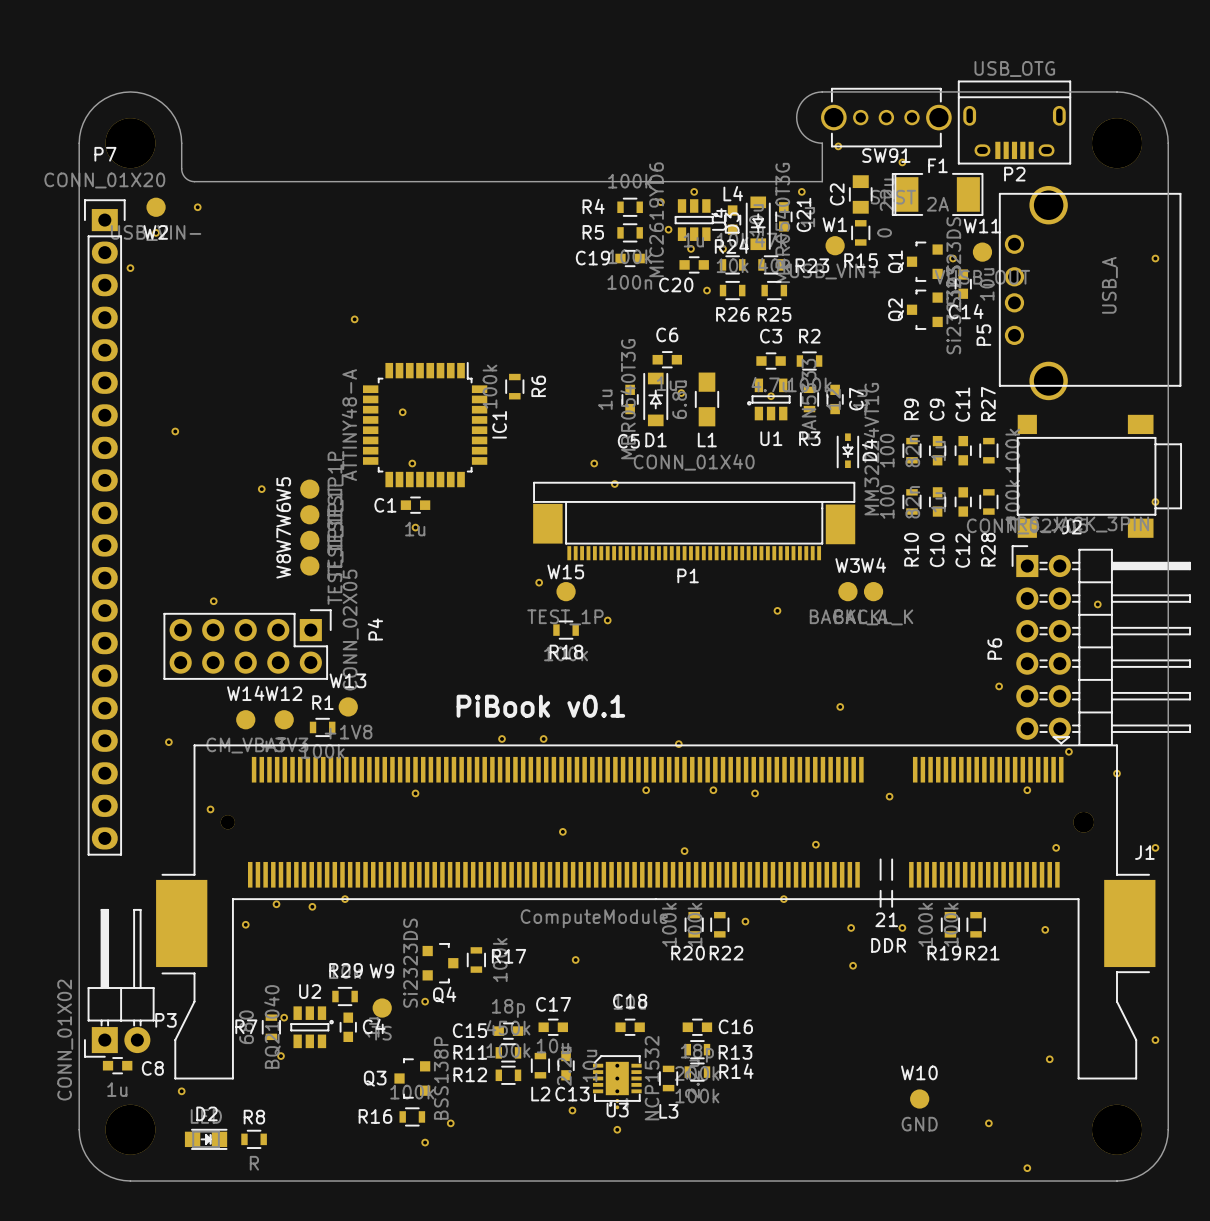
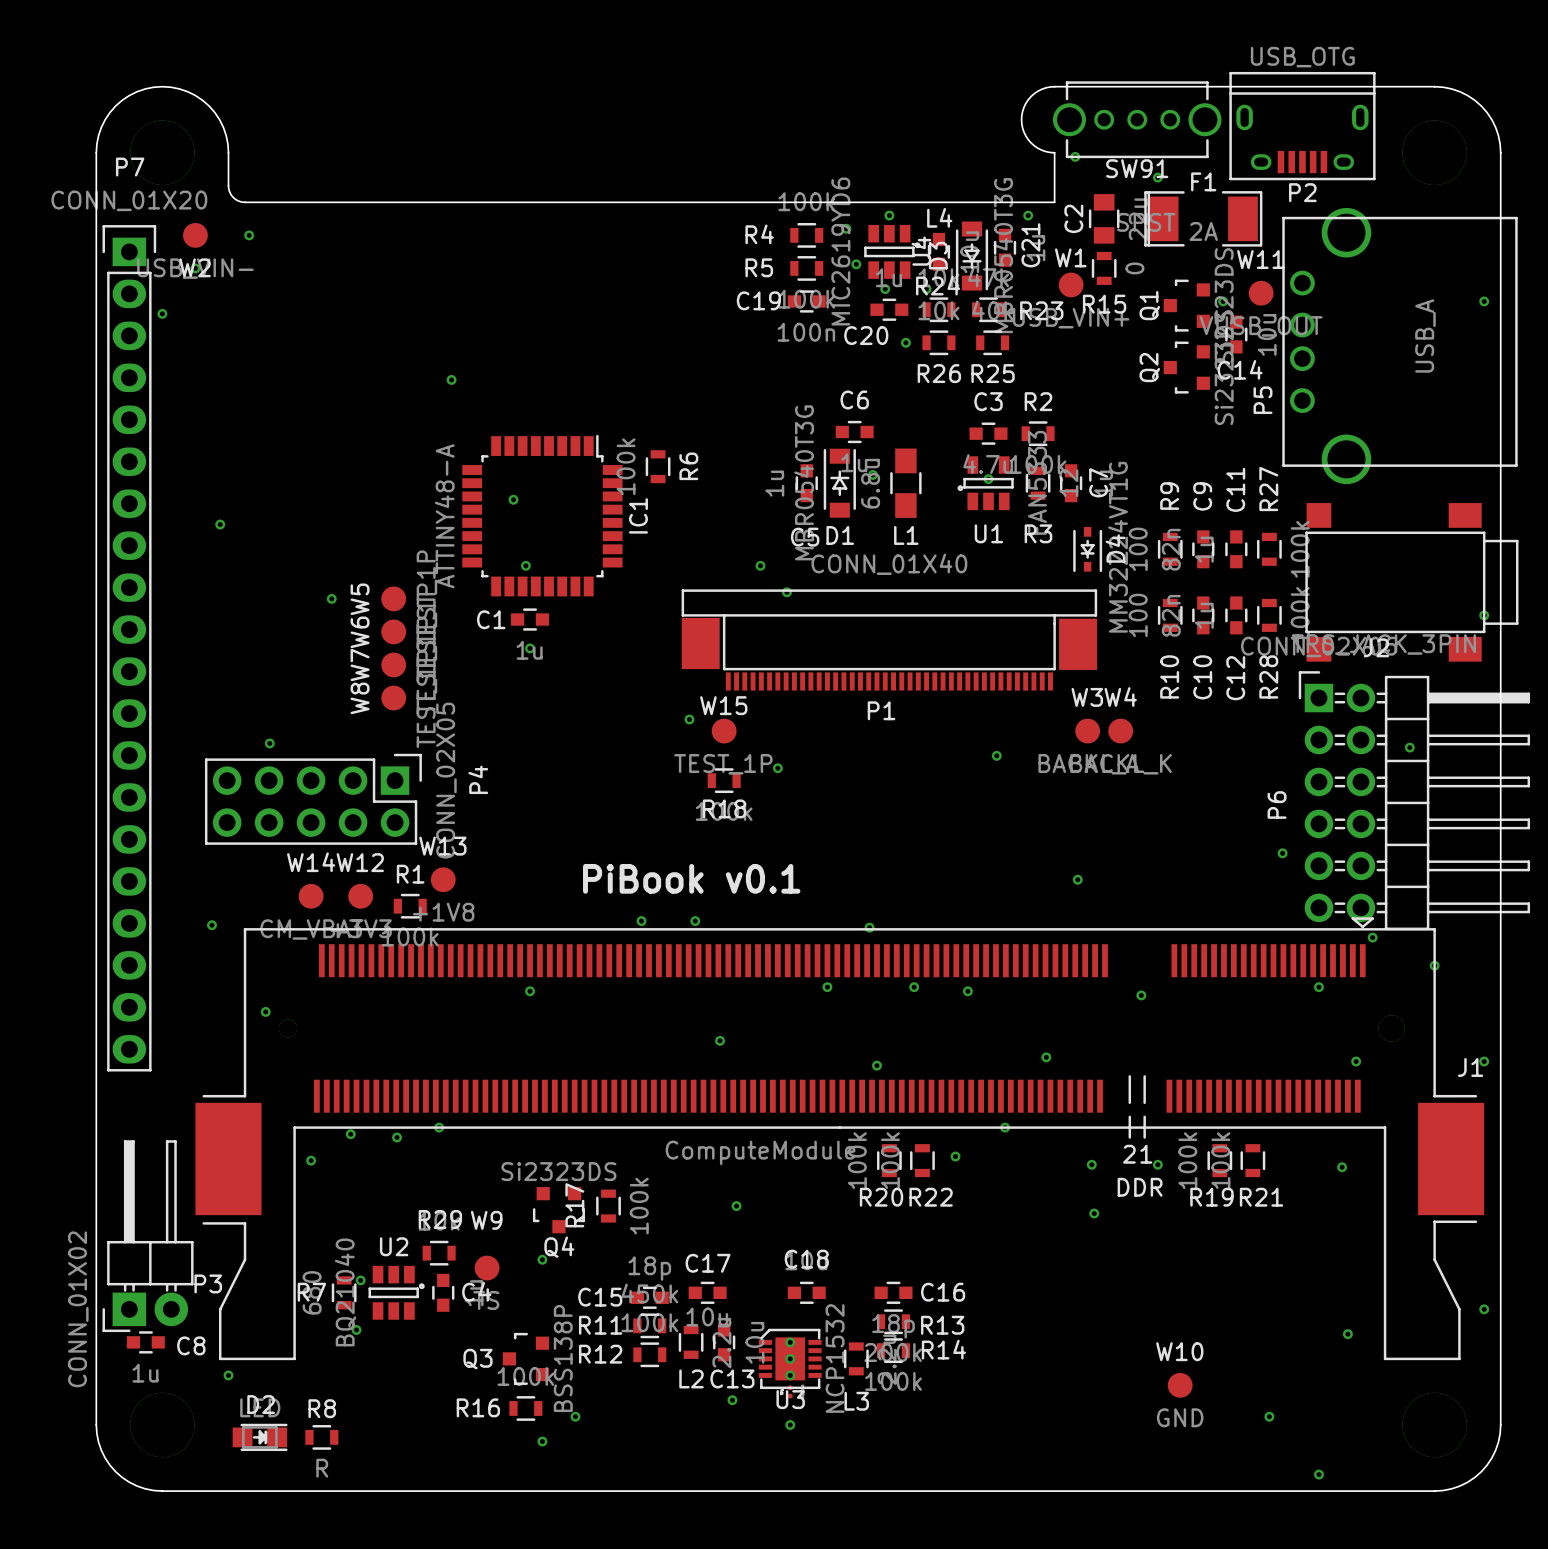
R17 name rotation: 0° (509, 956) -> 90° counterclockwise (574, 1205)
R17 name position: R17 (509, 956) -> R17 (574, 1205)
Q4 rotation: 0° (440, 963) -> 90° clockwise (558, 1210)

